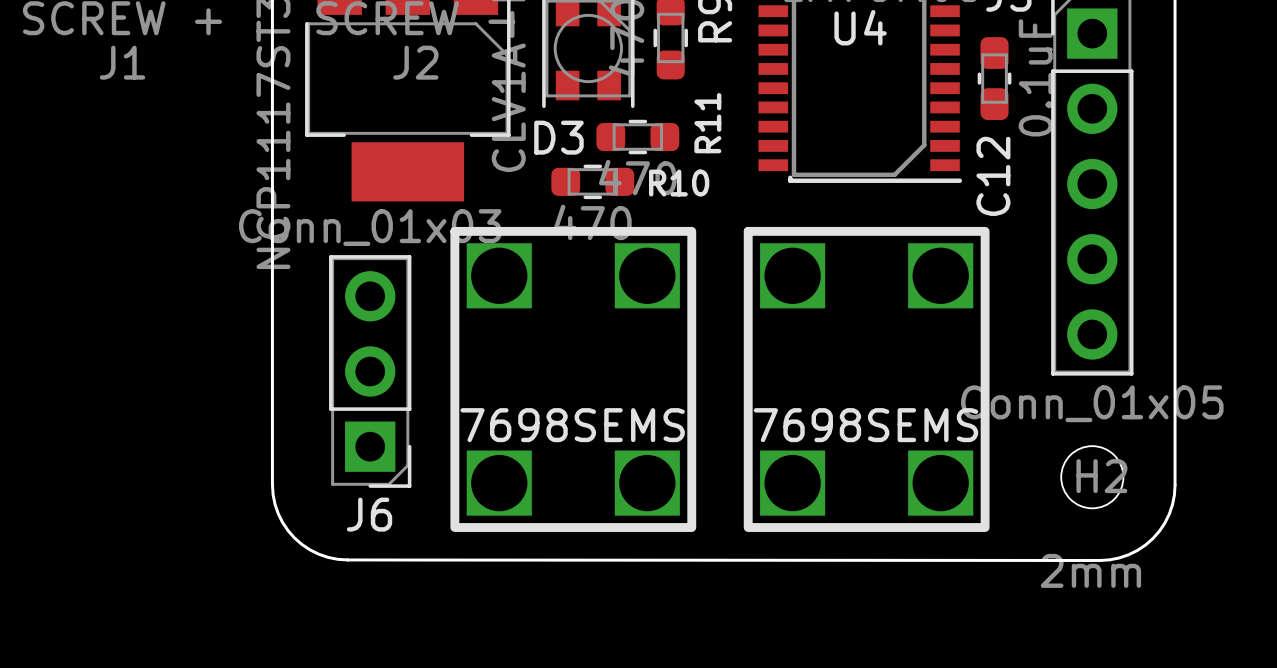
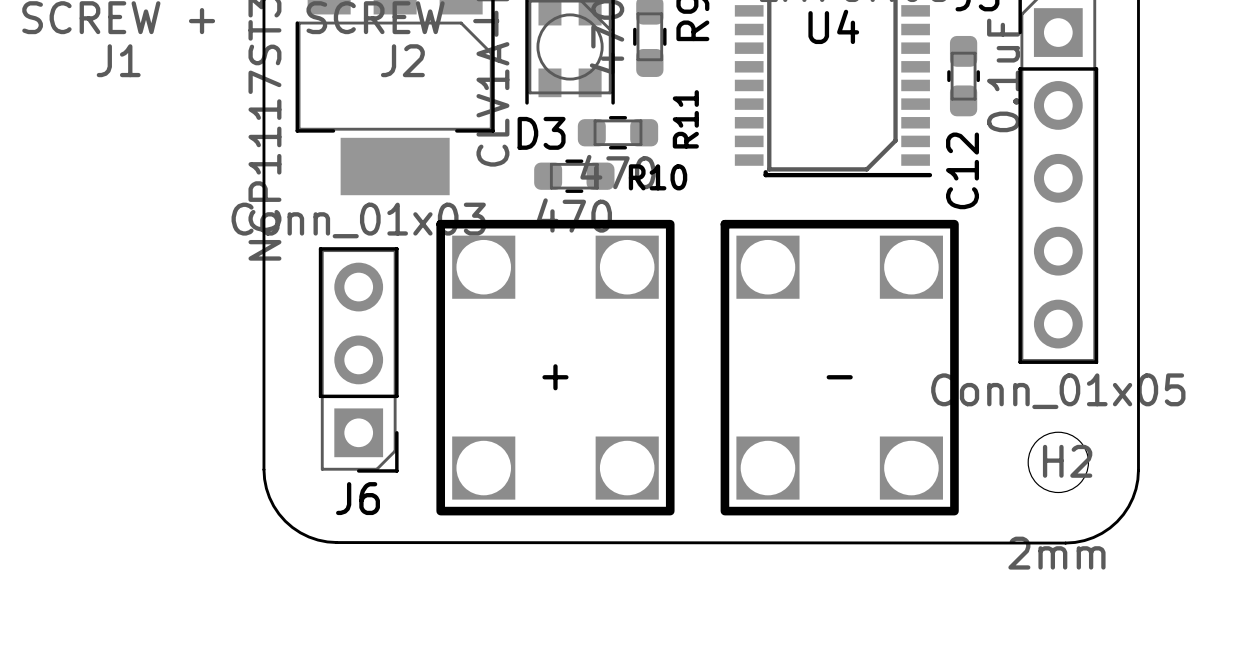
J1 text: none -> + (555, 377)
J2 text: none -> - (839, 377)
J1 text: 7698SEMS (572, 425) -> none
J2 text: 7698SEMS (865, 425) -> none

